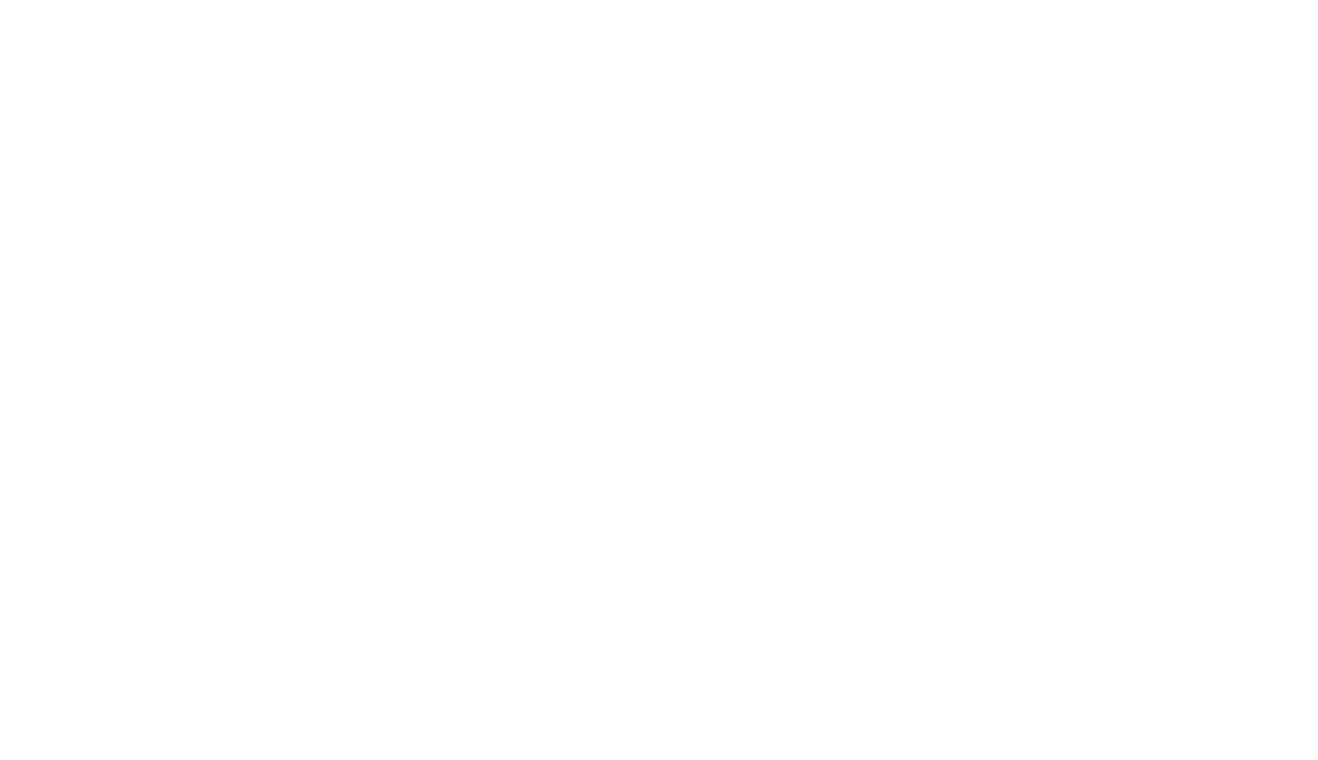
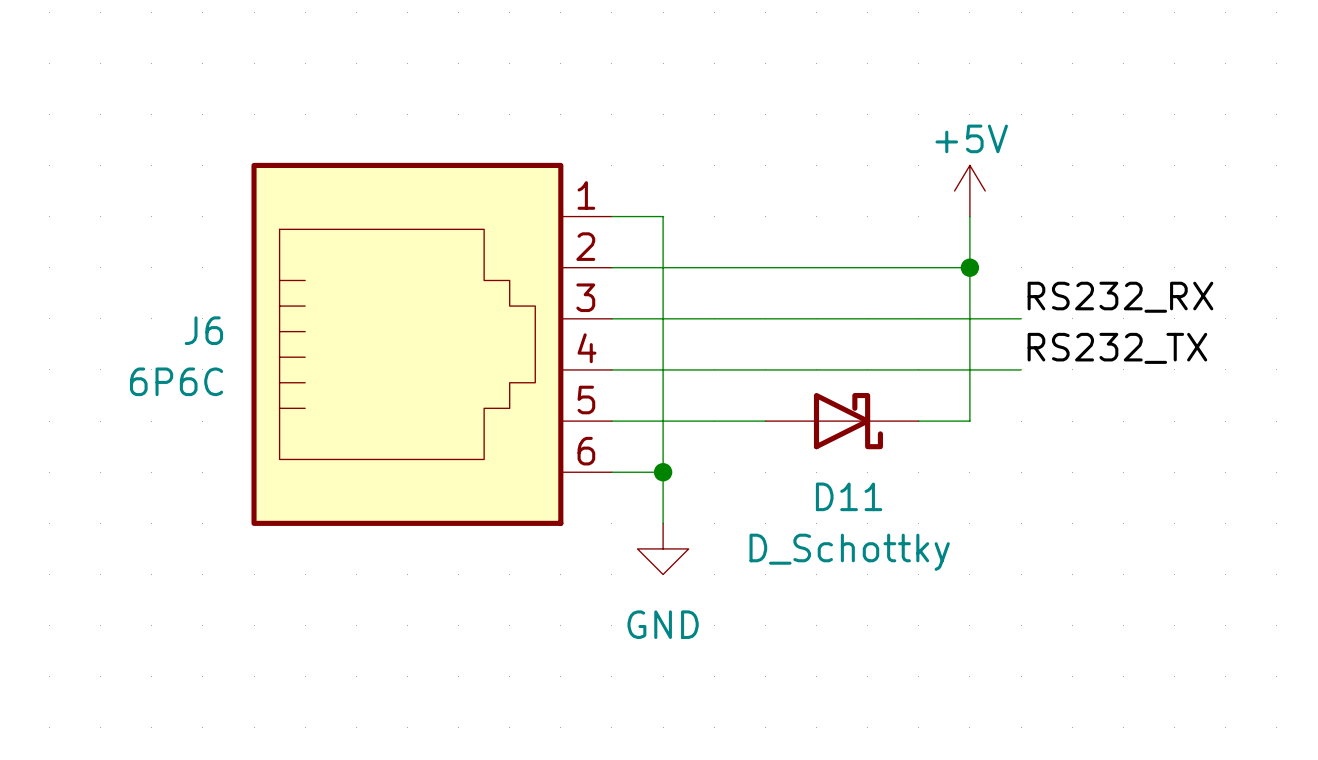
power symbol: none -> +5V (969, 191)
wire: none -> (611, 216) (663, 216) (663, 523)
wire: none -> (969, 216) (969, 421) (918, 421)
wire: none -> (611, 267) (969, 267)
junction: none -> (969, 267)
label: none -> RS232_RX (1120, 297)
wire: none -> (611, 318) (1021, 318)
J6: none -> 6P6C (431, 344)
label: none -> RS232_TX (1117, 348)
wire: none -> (611, 369) (1021, 369)
wire: none -> (611, 421) (765, 421)
D11: none -> D_Schottky (842, 421)
wire: none -> (611, 472) (663, 472)
junction: none -> (663, 472)
power symbol: none -> GND (663, 548)

